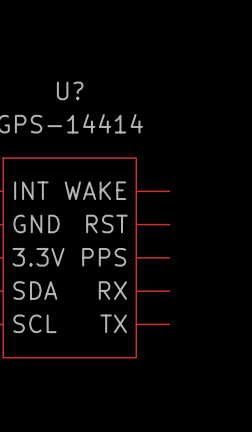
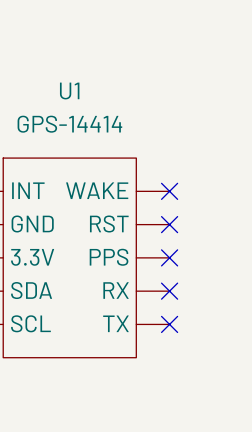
U? name: U? (70, 90) -> U1 (69, 91)
no-connect mark: none -> (169, 191)
no-connect mark: none -> (169, 224)
no-connect mark: none -> (169, 257)
no-connect mark: none -> (169, 291)
no-connect mark: none -> (169, 324)

